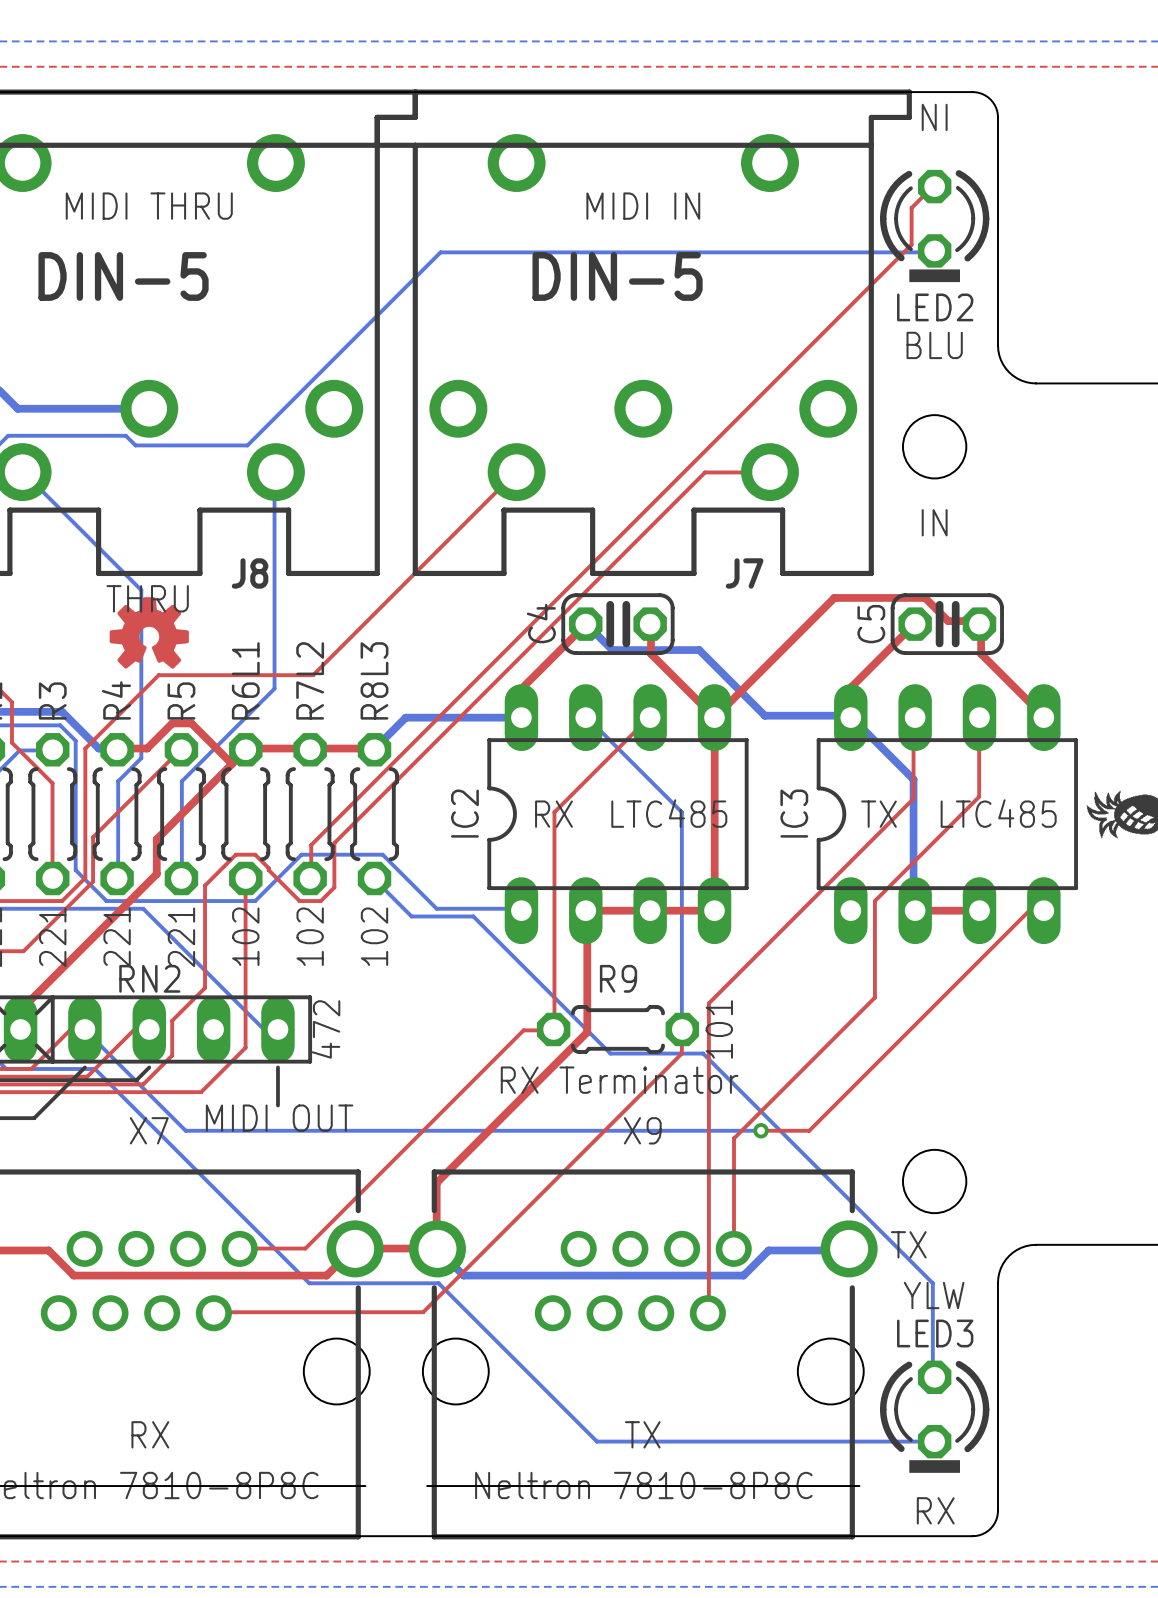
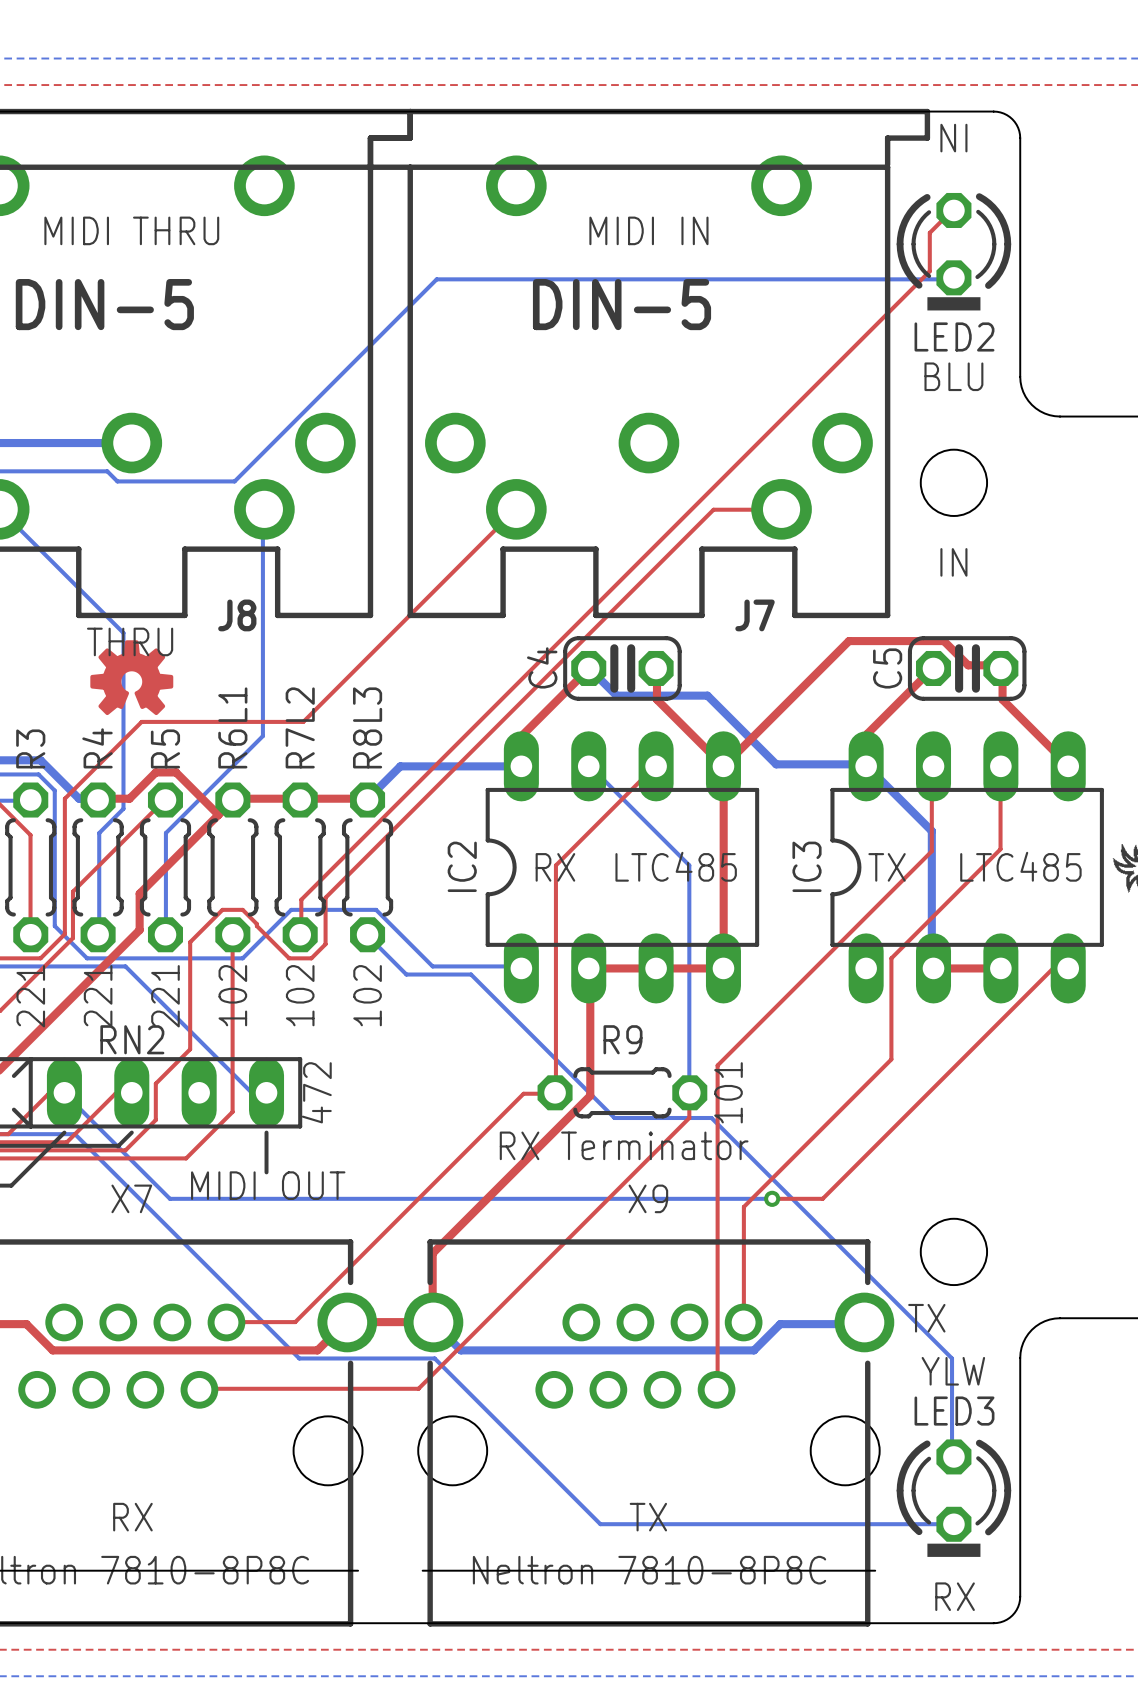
text position: TX (878, 814) -> TX (887, 867)

